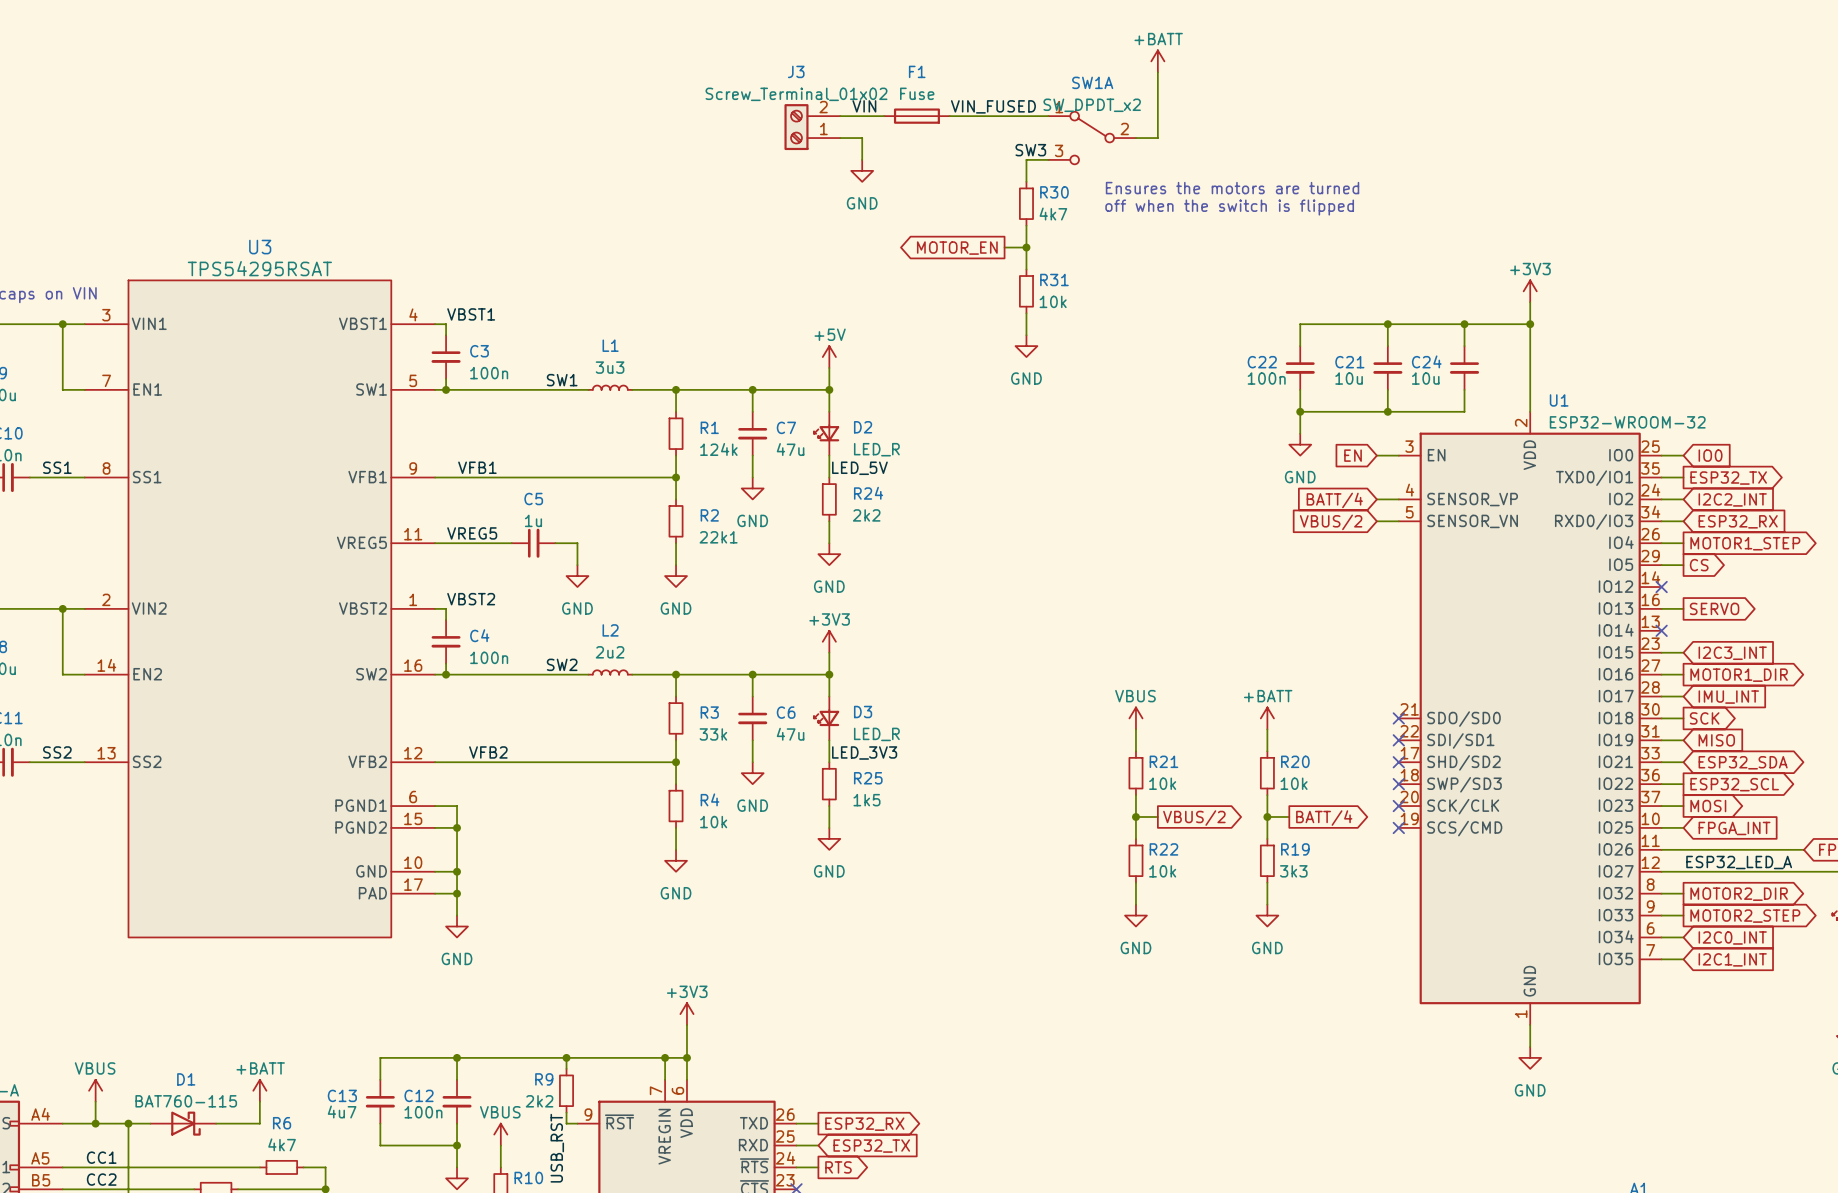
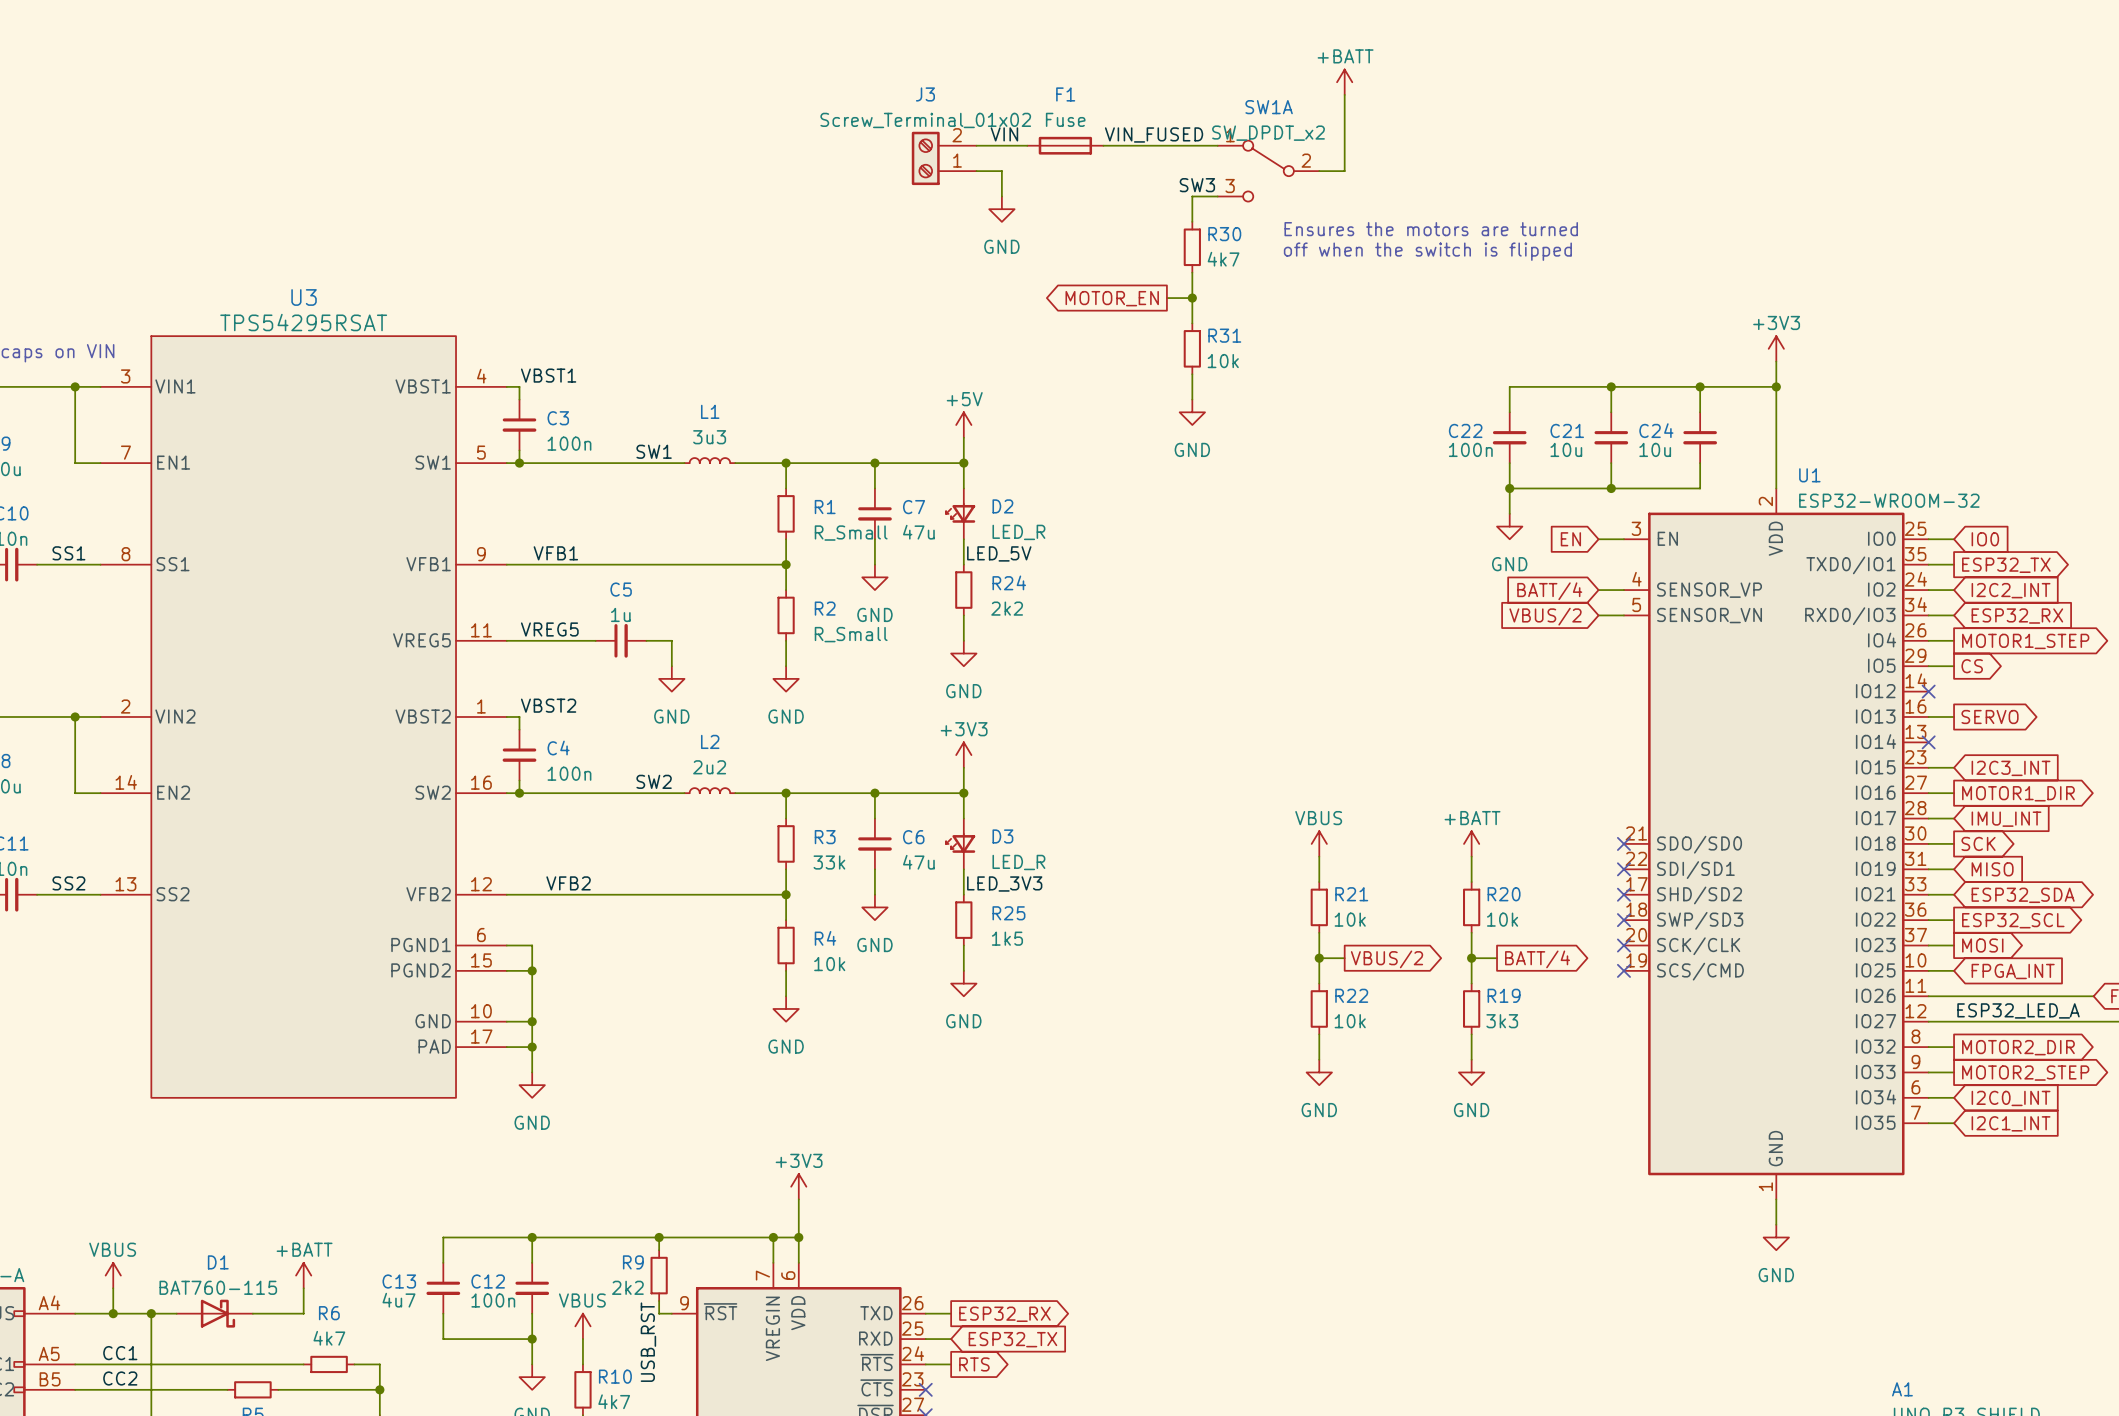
R1 value: 124k (718, 449) -> R_Small (851, 533)
R2 value: 22k1 (718, 537) -> R_Small (851, 634)

